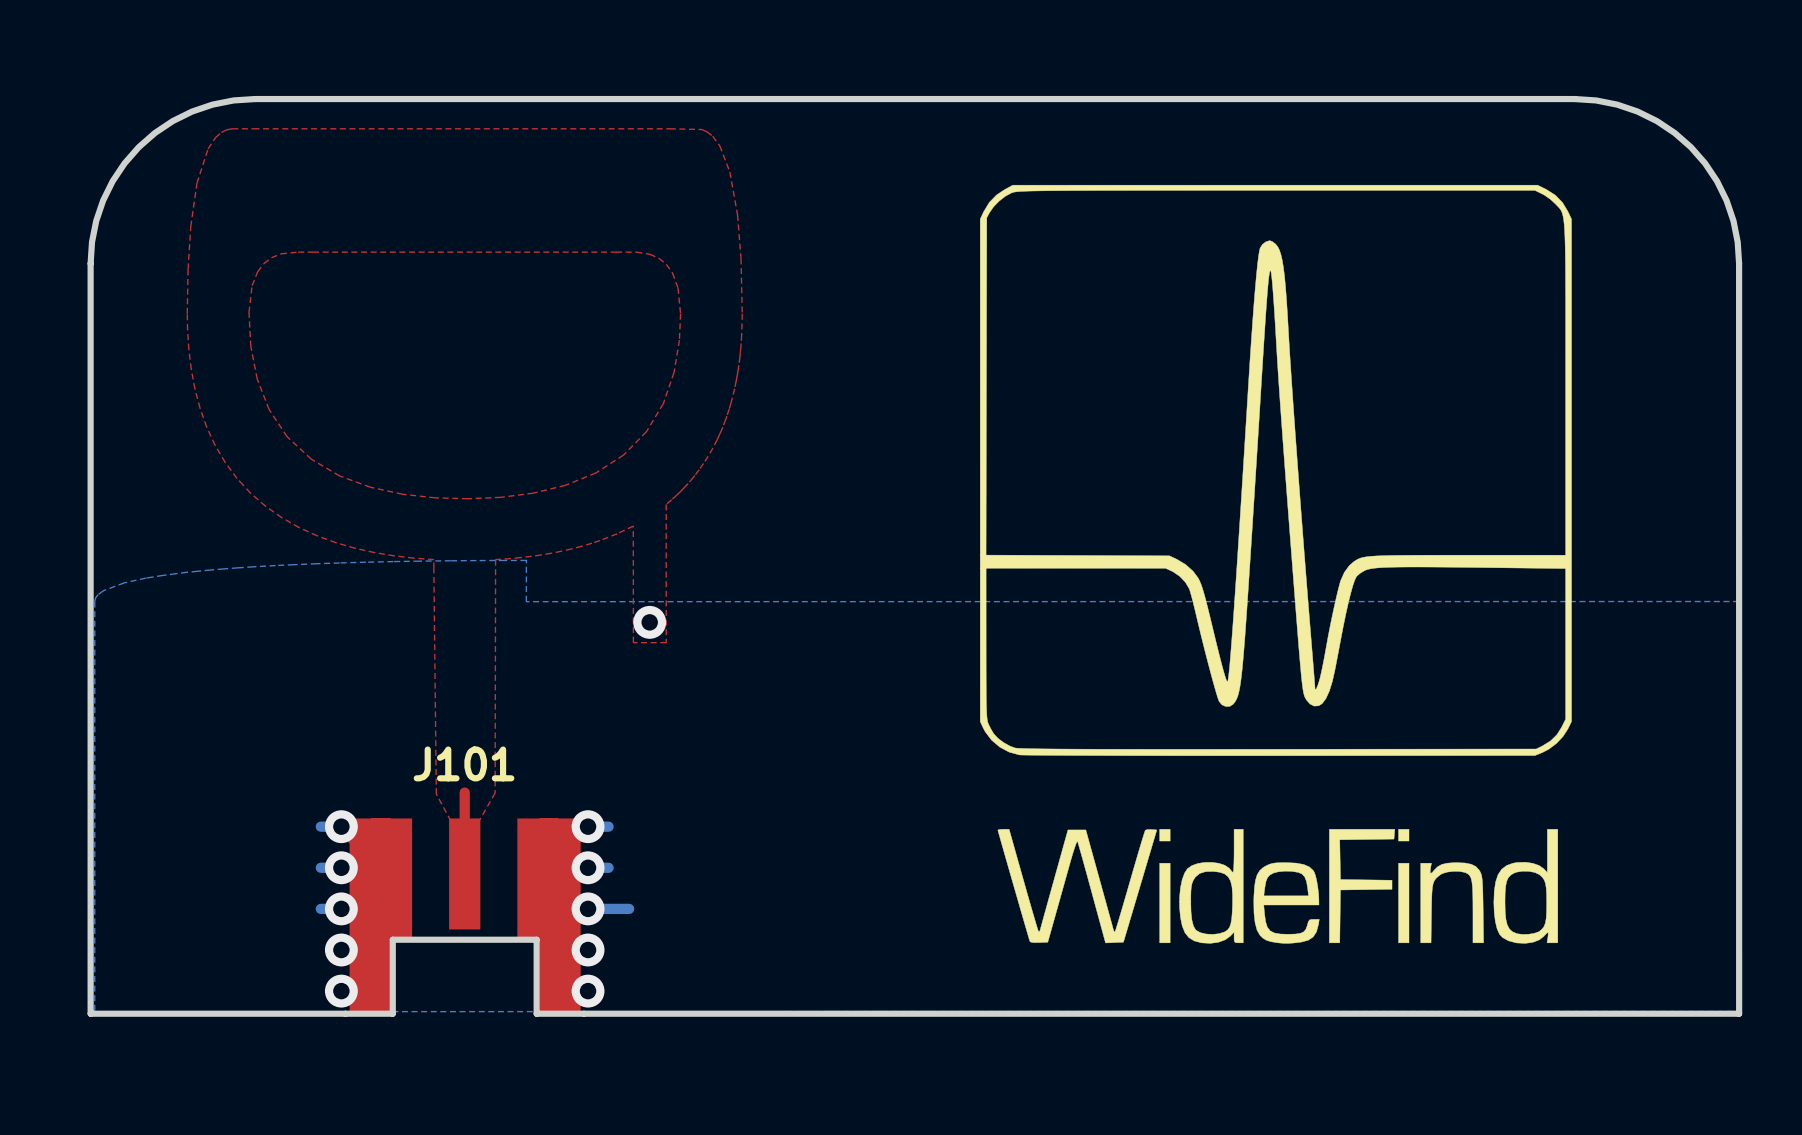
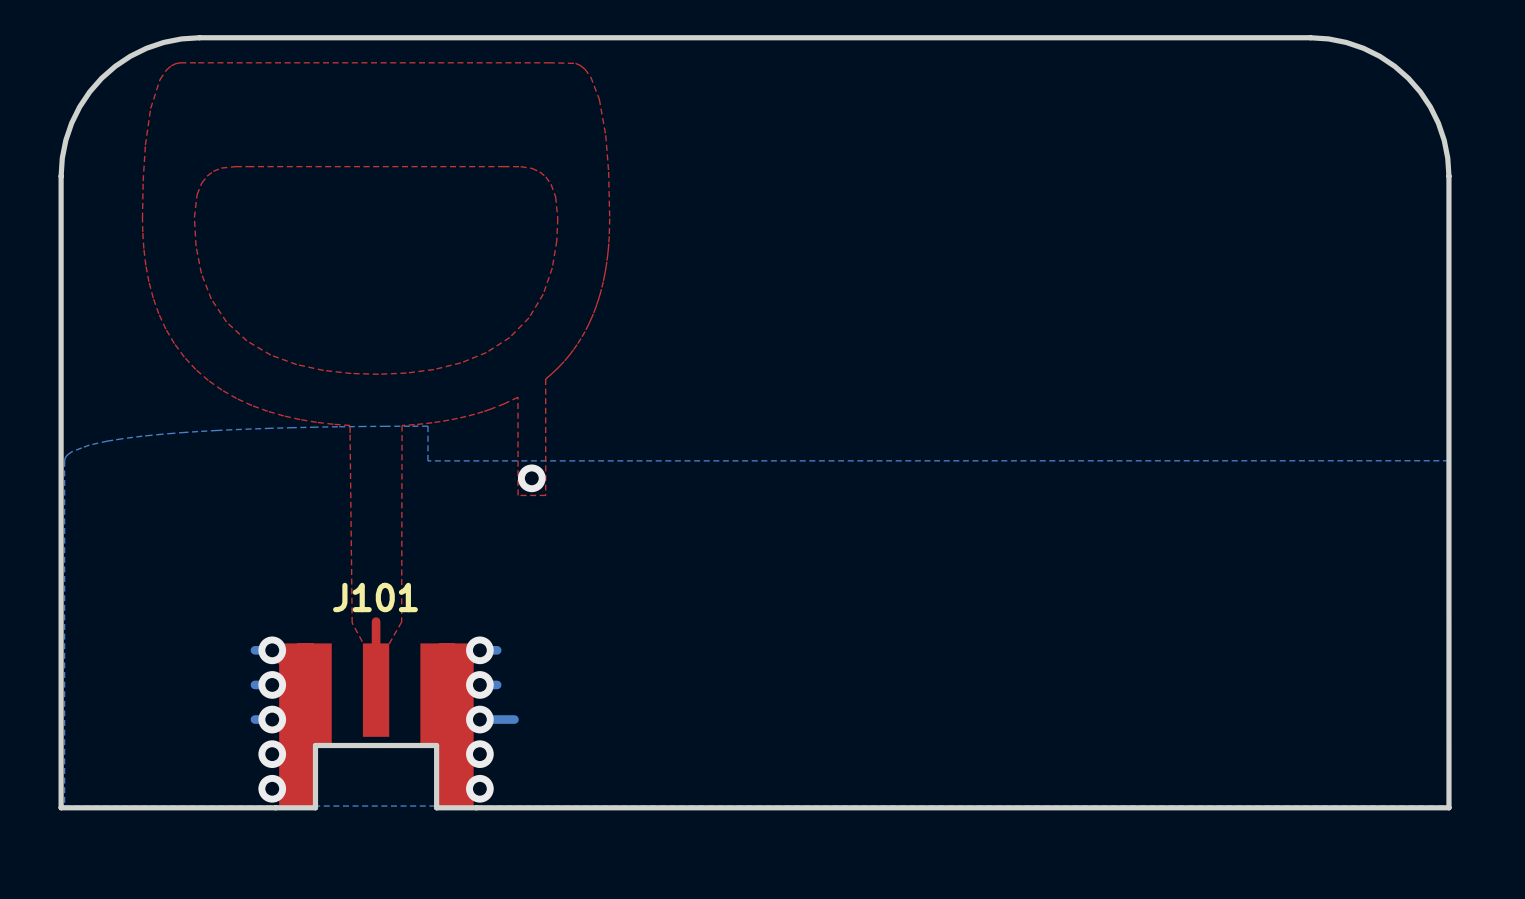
drawing: [980, 184, 1572, 944] -> none

